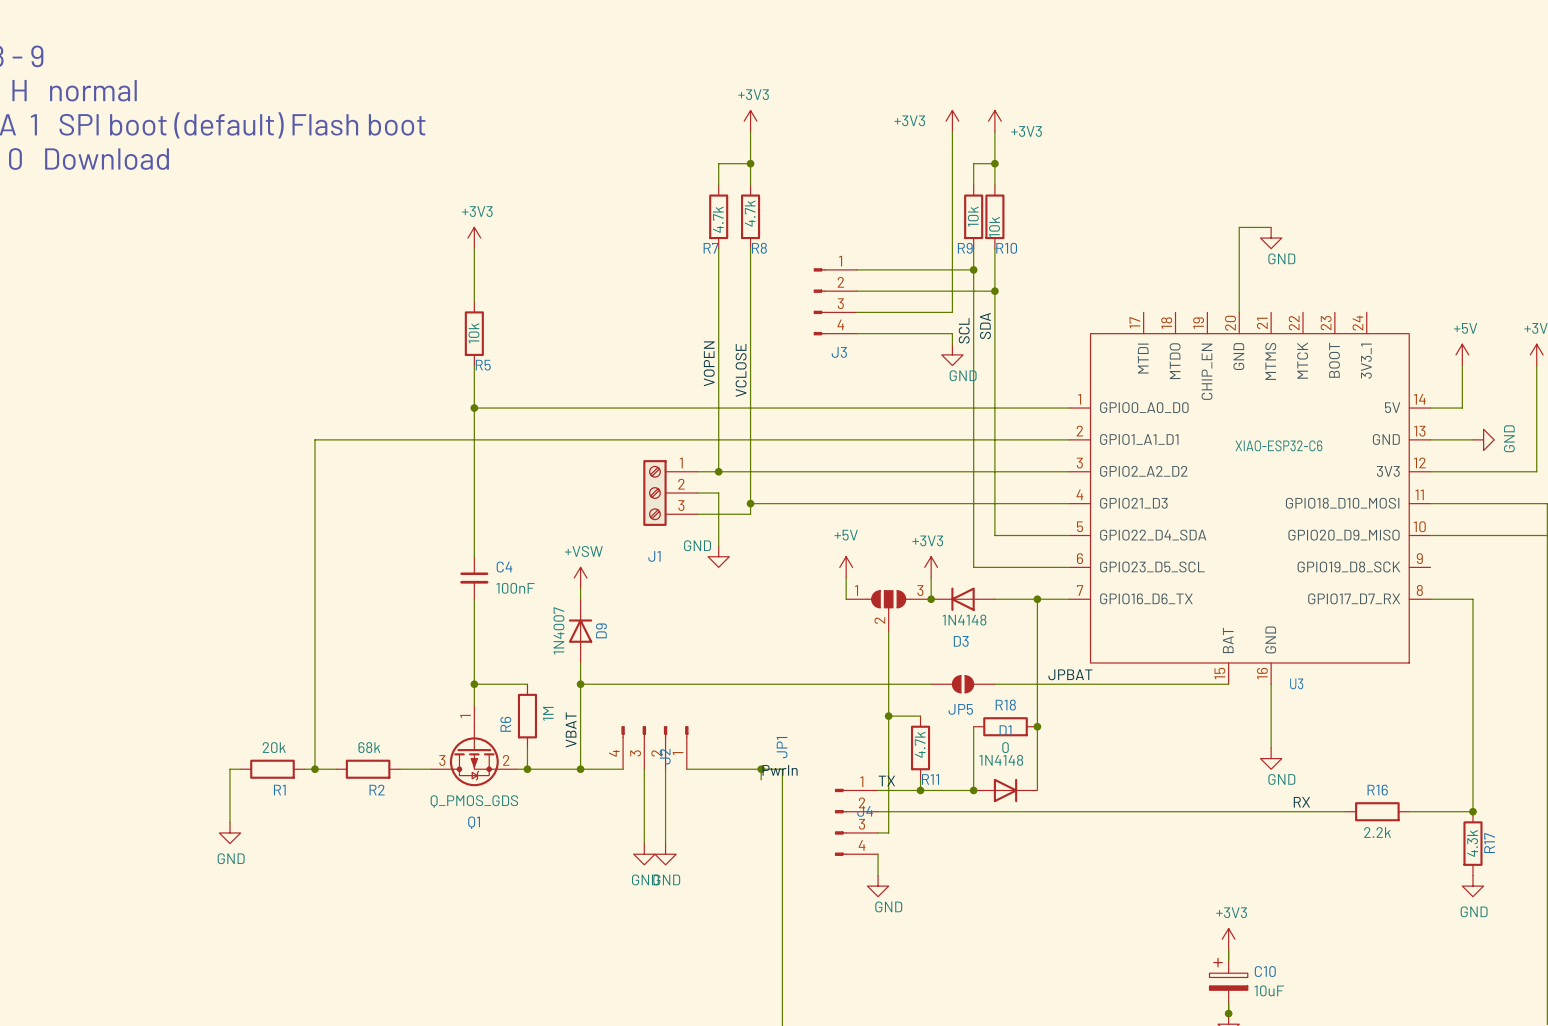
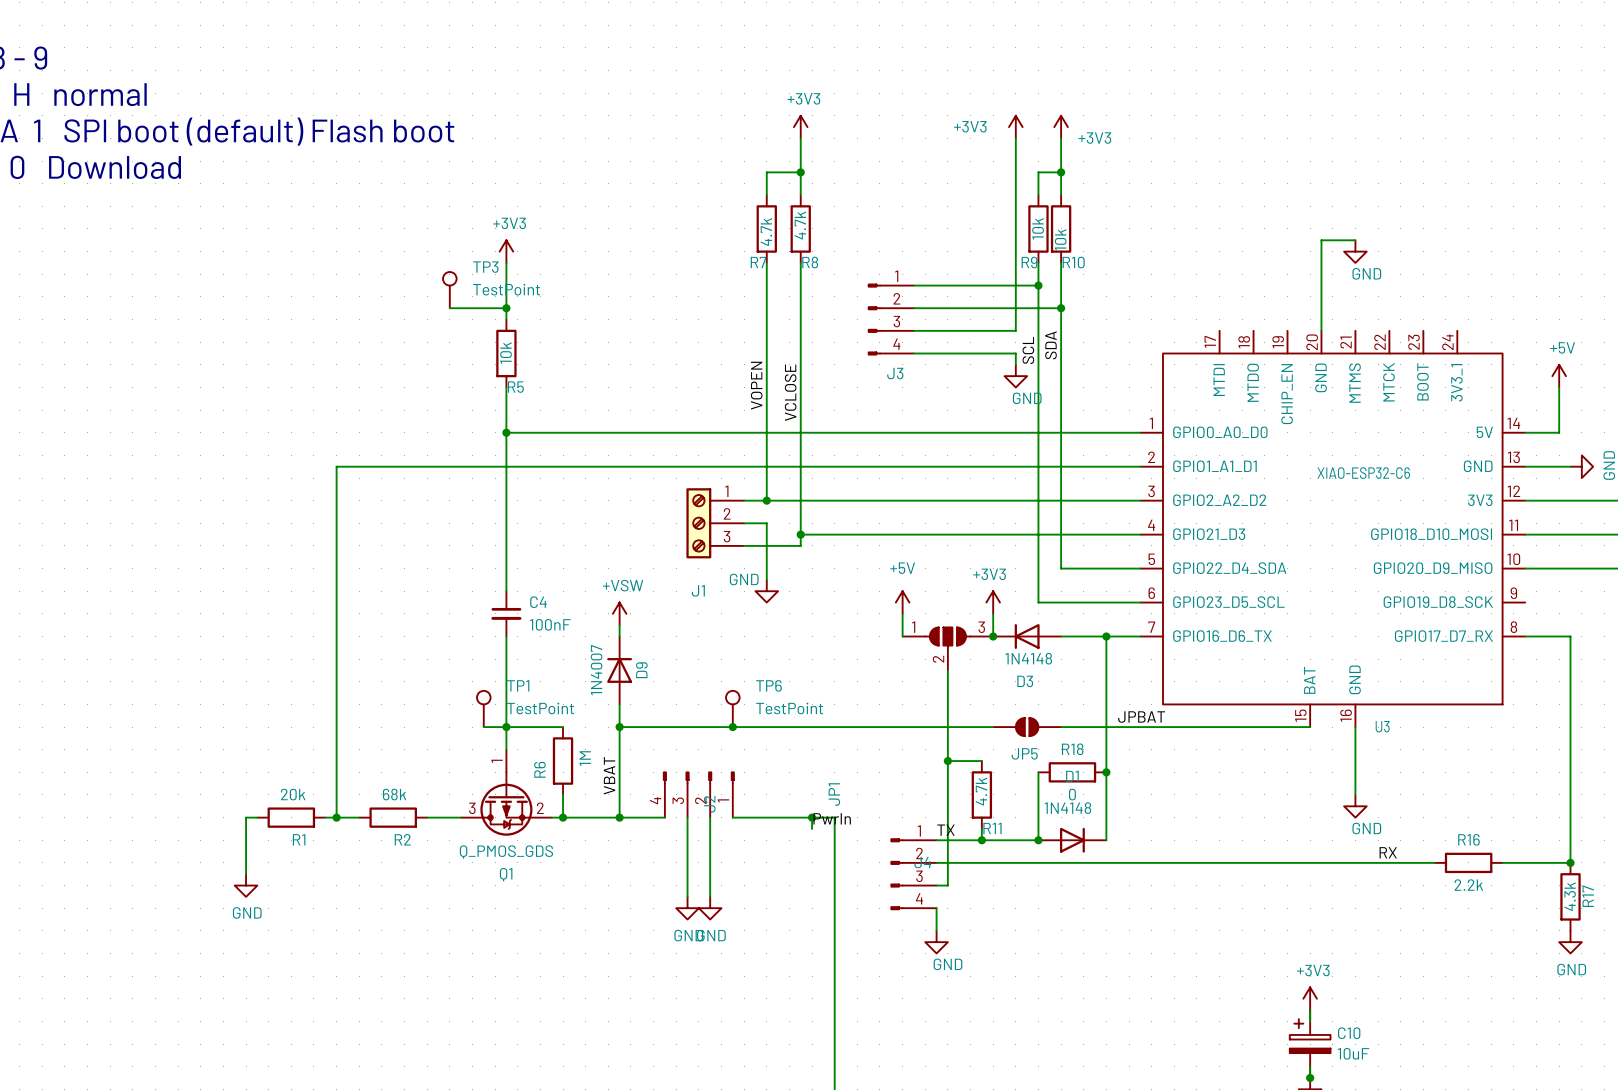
TP3: none -> TestPoint (449, 290)
wire: none -> (449, 308) (506, 308)
junction: none -> (506, 308)
TP1: none -> TestPoint (483, 708)
TP6: none -> TestPoint (732, 708)
wire: none -> (483, 727) (506, 727)
junction: none -> (732, 727)

